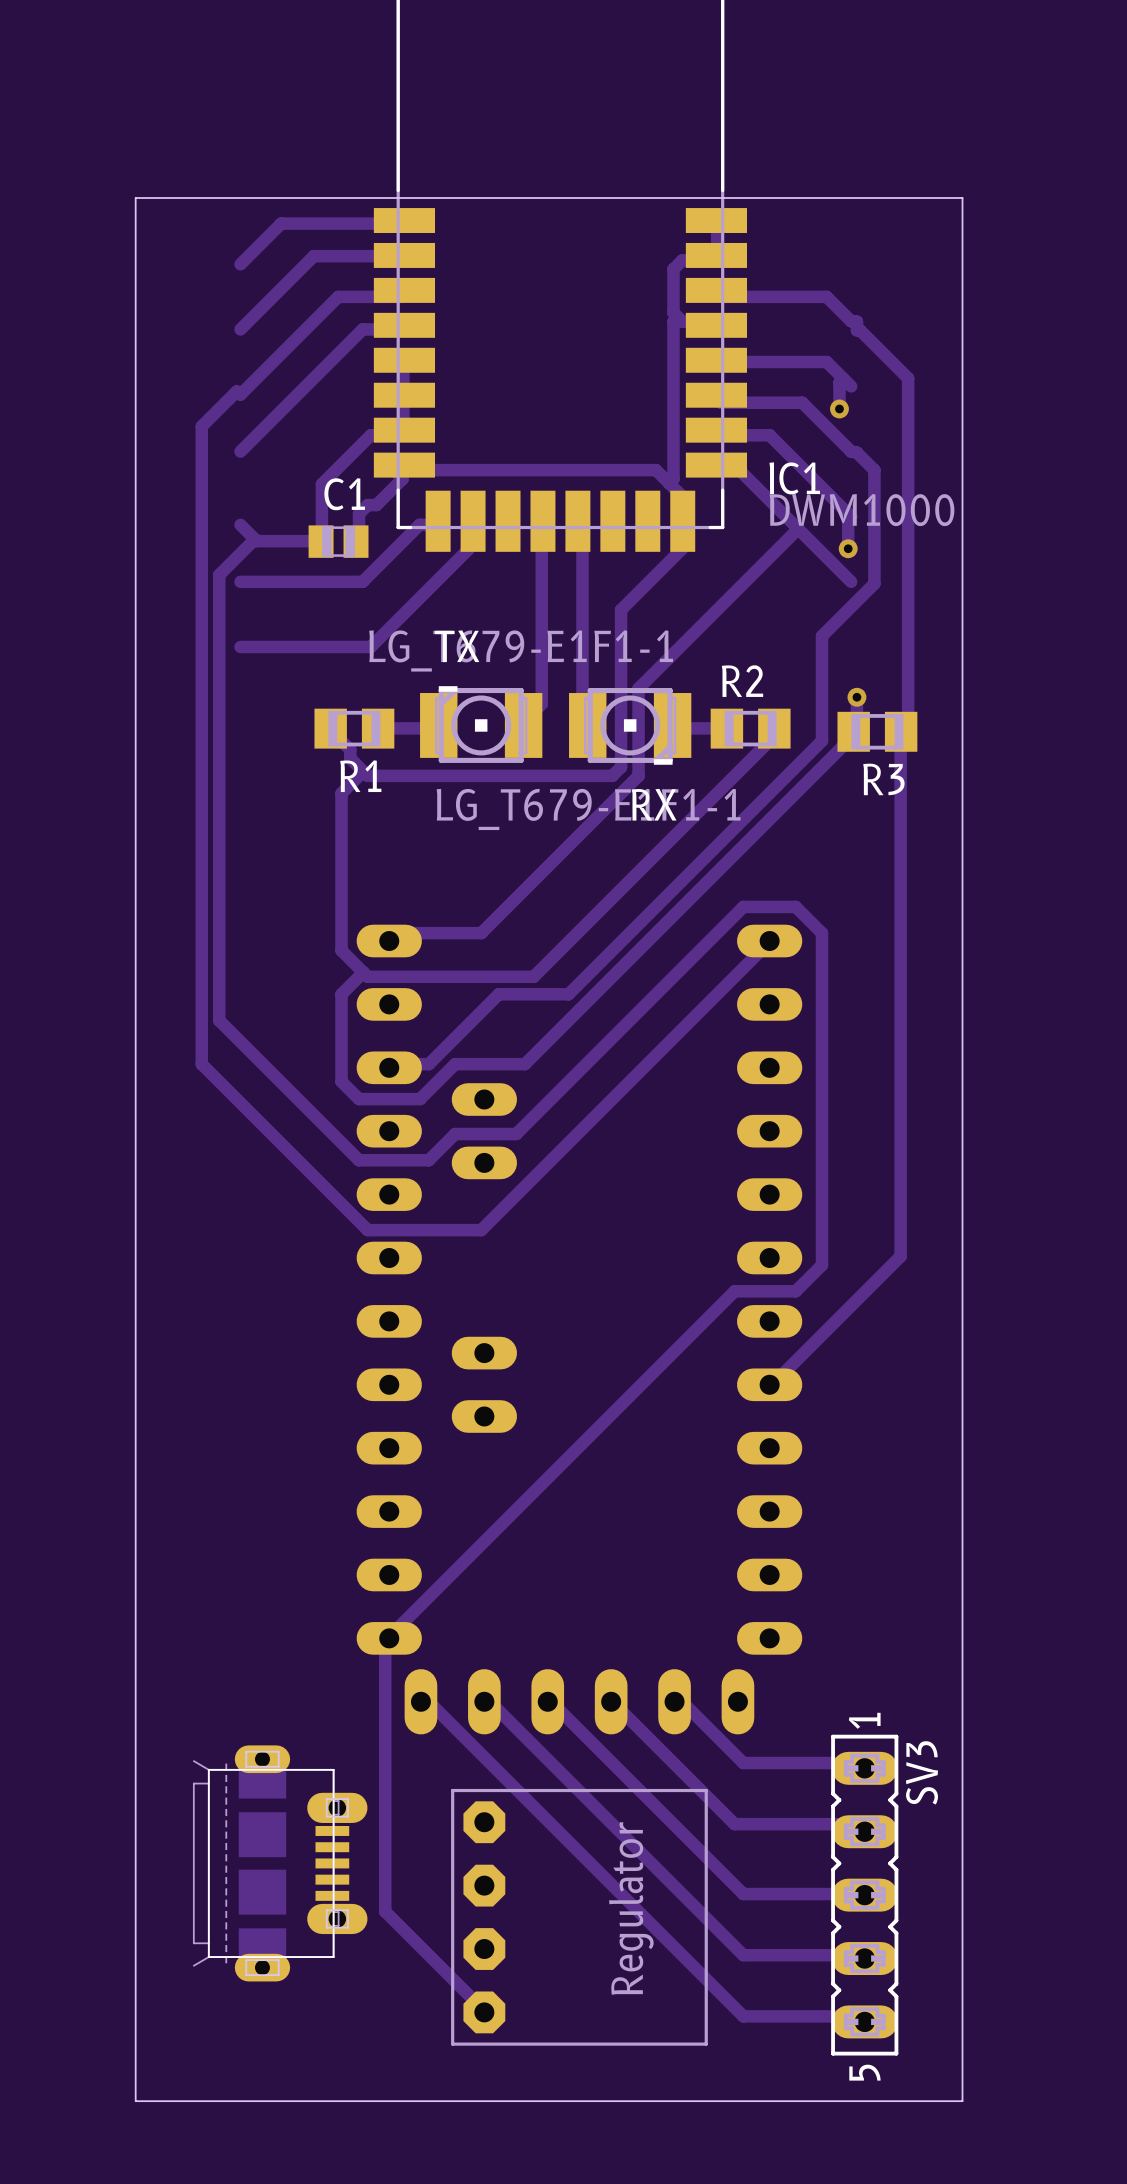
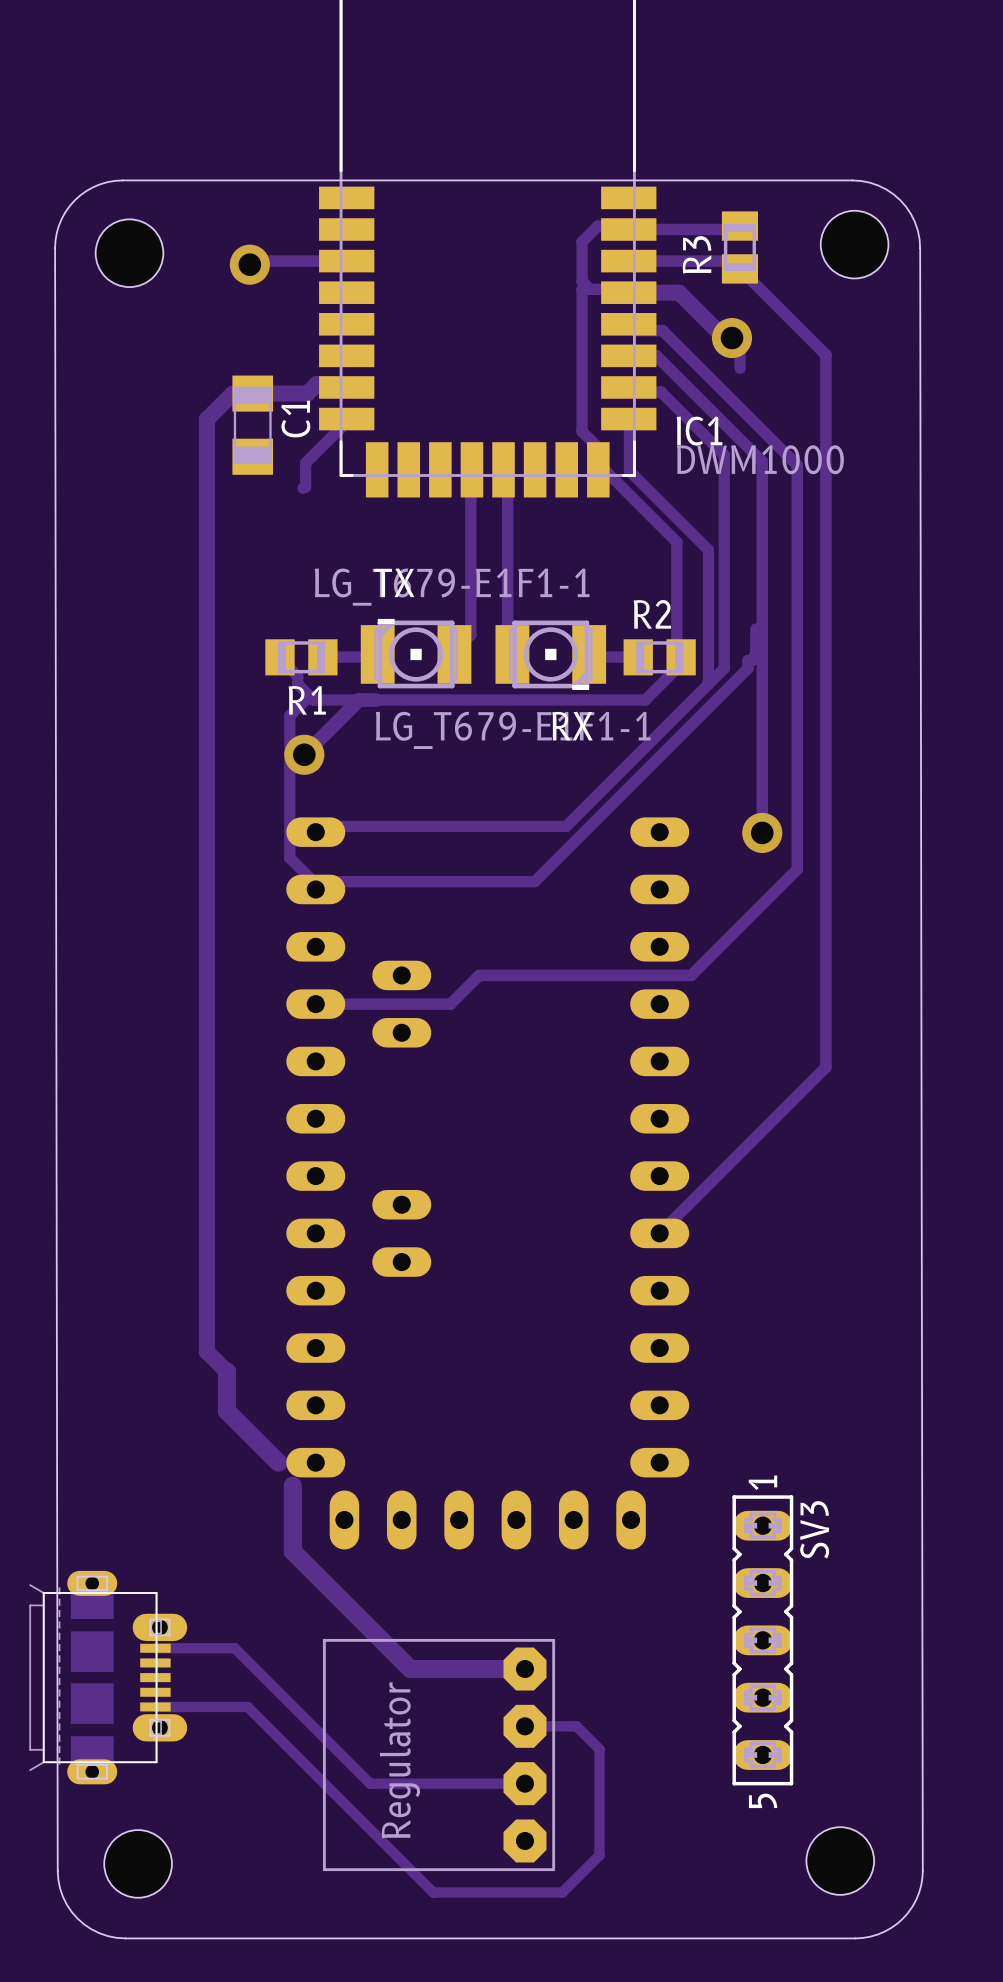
board edge: (135, 198) (962, 198) (962, 2101) (135, 2101) (135, 198) -> (122, 180) (107, 182) (93, 187) (74, 200) (61, 218) (56, 233) (55, 248) (57, 1870) (62, 1896) (71, 1912) (84, 1924) (107, 1936) (125, 1938) (855, 1938) (870, 1936) (884, 1931) (897, 1923) (912, 1906) (921, 1885) (922, 1870) (920, 247) (914, 222) (906, 206) (893, 194) (869, 182) (852, 180) (122, 180)
track: (404, 220) (403, 223) (281, 223) (240, 264) -> none
track: (716, 220) (716, 255) (708, 260) (682, 260) (673, 269) (673, 312) (682, 321) -> (739, 226) (736, 229) (628, 229) (621, 226) (597, 226) (582, 241) (582, 281) (589, 289) (597, 289)
track: (404, 255) (313, 256) (240, 329) -> none
hole: none -> (854, 244)
hole: none -> (129, 253)
track: (404, 290) (403, 296) (338, 296) (240, 394) (236, 391) (201, 426) (201, 1064) (367, 1230) (481, 1230) (769, 941) -> (346, 261) (253, 261) (249, 264)
track: (716, 290) (720, 296) (826, 296) (851, 321) (856, 321) (856, 330) (859, 329) (908, 378) (908, 728) (900, 732) (900, 1256) (778, 1378) (769, 1384) -> (628, 261) (732, 261) (825, 354) (825, 1067) (659, 1233)
via: none -> (249, 264)
track: none -> (586, 285) (582, 289) (582, 431)
track: (677, 317) (673, 321) (673, 478) (669, 483) -> none
track: none -> (629, 289) (628, 292) (679, 292) (724, 338) (732, 338)
track: (404, 325) (403, 329) (362, 329) (240, 451) -> none
track: (404, 360) (403, 435) (370, 435) (321, 484) (321, 541) (256, 541) (240, 524) -> none
track: (716, 360) (720, 362) (826, 362) (851, 386) -> (628, 324) (635, 330) (662, 330) (797, 465) (797, 869) (691, 975) (479, 975) (450, 1004) (315, 1004)
via: none -> (732, 338)
track: (716, 395) (720, 402) (802, 402) (851, 451) (856, 452) (874, 470) (874, 583) (822, 636) -> (661, 392) (724, 455) (724, 573)
track: none -> (628, 355) (656, 355) (762, 461) (762, 832)
via: (839, 408) -> none
track: none -> (327, 384) (316, 384) (307, 393) (232, 393) (206, 419) (206, 1351) (226, 1371) (226, 1411) (278, 1462)
track: (752, 435) (769, 435) (851, 516) (848, 522) (848, 548) -> none
track: (716, 465) (720, 467) (737, 467) (851, 581) -> (628, 419) (629, 470) (708, 549) (708, 684)
track: (664, 478) (656, 470) (411, 470) (402, 461) (393, 470) (402, 478) (376, 505) (367, 505) -> (329, 439) (345, 423) (313, 455)
C1 name position: C1 (344, 494) -> C1 (295, 419)
track: (438, 521) (435, 524) (419, 524) (362, 581) (240, 581) -> none
track: (473, 521) (468, 524) (468, 549) (370, 646) (240, 646) -> none
track: (682, 521) (682, 548) (621, 609) (621, 767) (612, 775) -> (598, 469) (605, 470) (676, 542) (676, 652) (684, 660) (676, 668)
C1 footprint: [308, 525, 369, 558] -> [232, 375, 274, 475]
track: (798, 528) (638, 688) (638, 775) (481, 933) (393, 933) (389, 941) -> none
track: (254, 539) (219, 574) (219, 1020) (359, 1160) (428, 1160) (455, 1134) (516, 1134) (743, 906) (795, 906) (822, 933) (822, 1265) (795, 1291) (734, 1291) (385, 1640) (385, 1911) (484, 2012) -> none
via: (848, 548) -> none
via: (856, 697) -> none
R3 rotation: 0° (877, 731) -> 90° clockwise (739, 247)
R3 position: (877, 731) -> (739, 247)
track: none -> (375, 700) (359, 700) (304, 754)
track: (734, 775) (533, 976) -> (645, 700) (534, 700)
via: none -> (304, 754)
track: (647, 915) (568, 994) (498, 994) (428, 1064) (393, 1064) (389, 1067) -> (566, 826) (321, 826) (315, 832)
via: none -> (762, 832)
track: (363, 972) (341, 994) (341, 1081) (359, 1099) (420, 1099) (455, 1064) (524, 1064) (612, 976) -> (463, 881) (534, 881)
part position: (579, 1329) -> (487, 1183)
track: none -> (292, 1485) (292, 1551) (410, 1669) (525, 1669)
track: (420, 1701) (428, 1701) (743, 2016) (856, 2016) (864, 2021) -> none
track: (484, 1701) (490, 1701) (743, 1955) (856, 1955) (864, 1958) -> none
track: (547, 1701) (551, 1701) (743, 1894) (864, 1895) -> none
track: (611, 1701) (734, 1824) (856, 1824) (864, 1831) -> none
track: (674, 1701) (682, 1701) (743, 1763) (856, 1763) (864, 1768) -> none
track: none -> (155, 1648) (234, 1648) (370, 1783) (525, 1783)
part position: (280, 1863) -> (108, 1677)
track: none -> (155, 1706) (247, 1706) (433, 1892) (562, 1892) (599, 1855) (599, 1749) (576, 1726) (525, 1726)
SV3 position: (864, 1895) -> (762, 1640)
part: (579, 1917) -> none
part: none -> (439, 1755)
hole: none -> (840, 1861)
hole: none -> (138, 1863)

